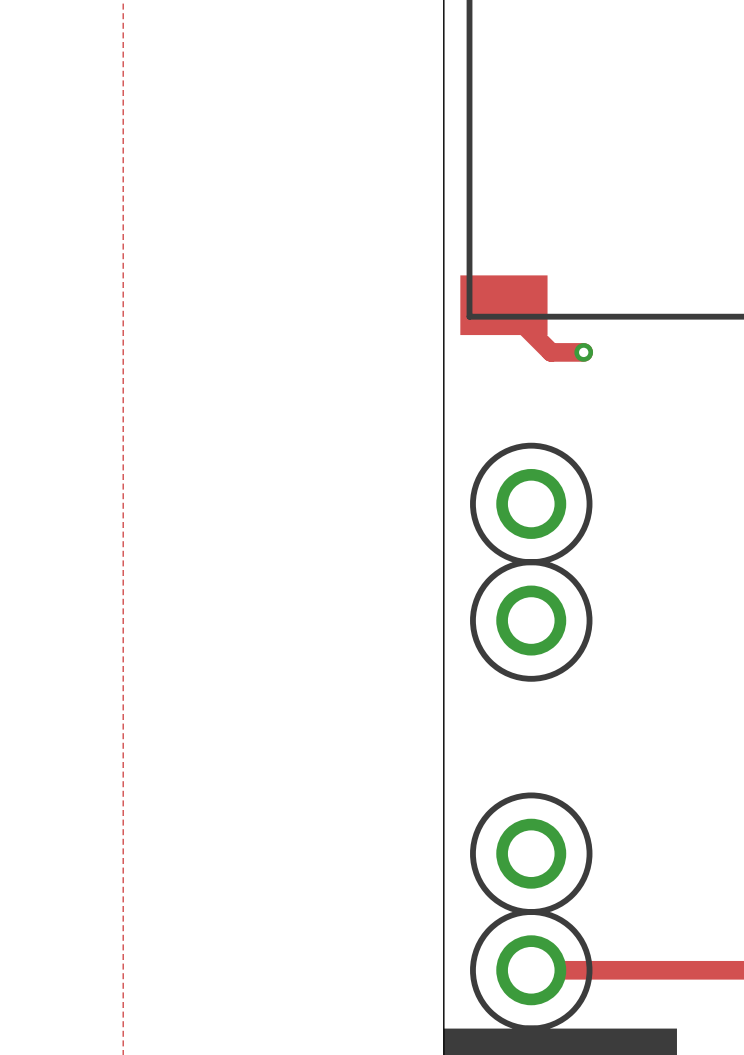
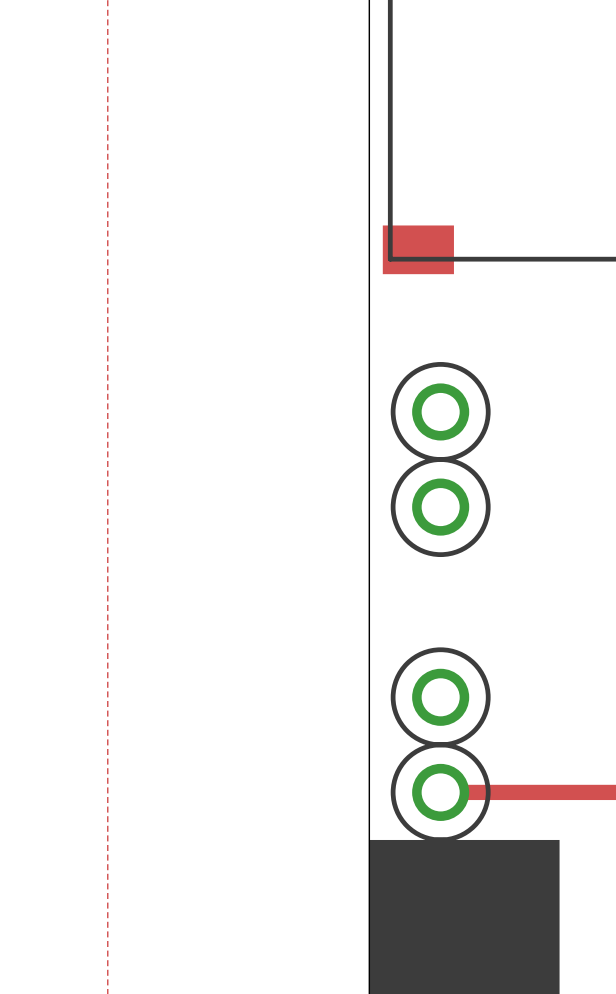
track: (503, 305) (551, 352) (583, 352) -> none
via: (583, 352) -> none

